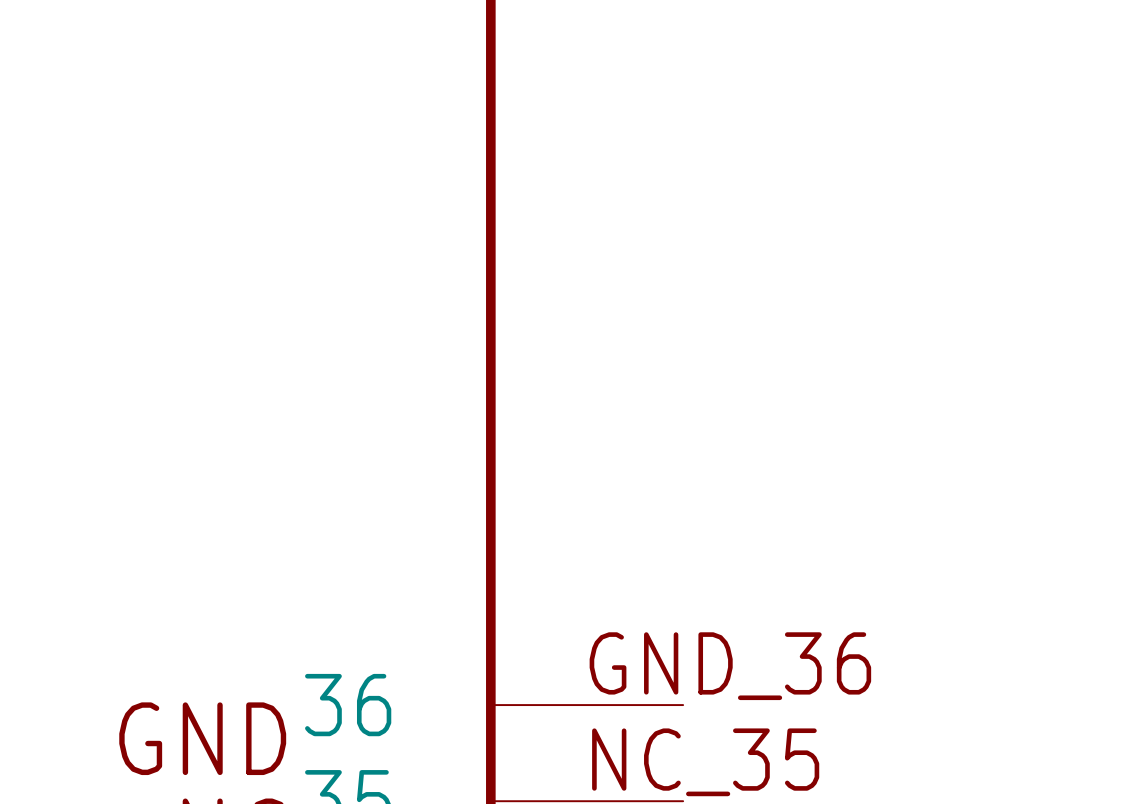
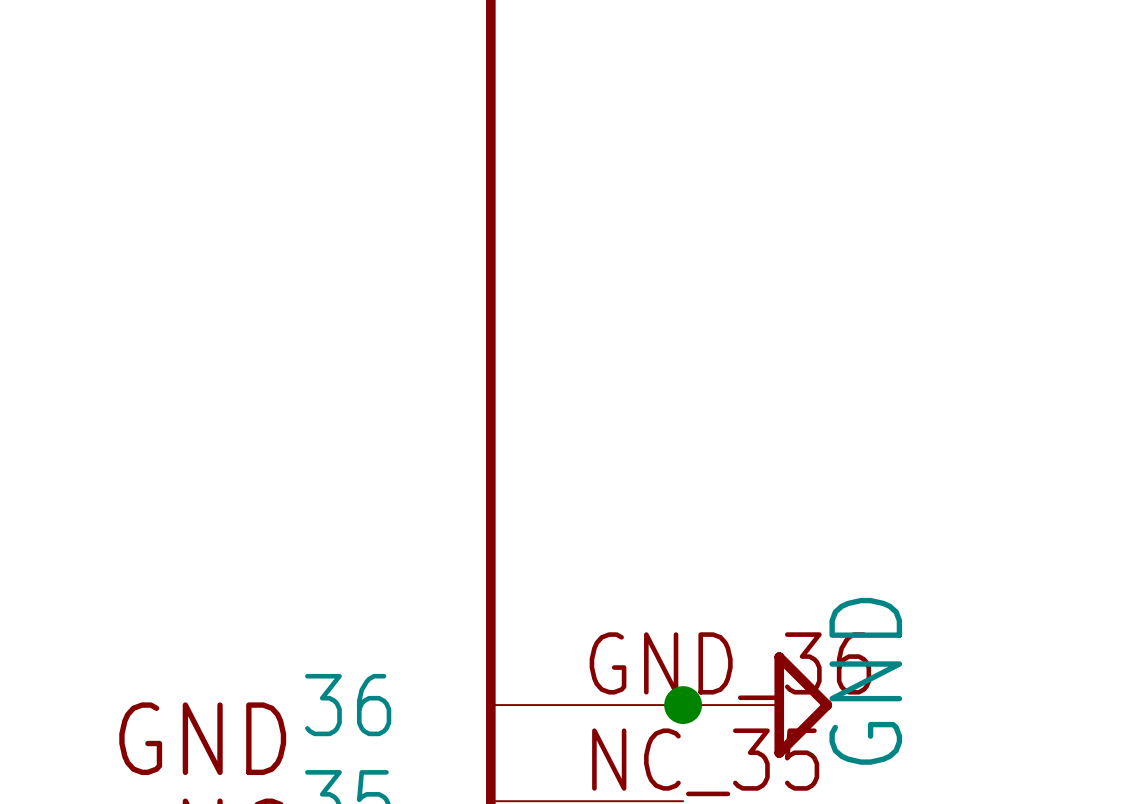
junction: none -> (683, 705)
power symbol: none -> GND (757, 705)

